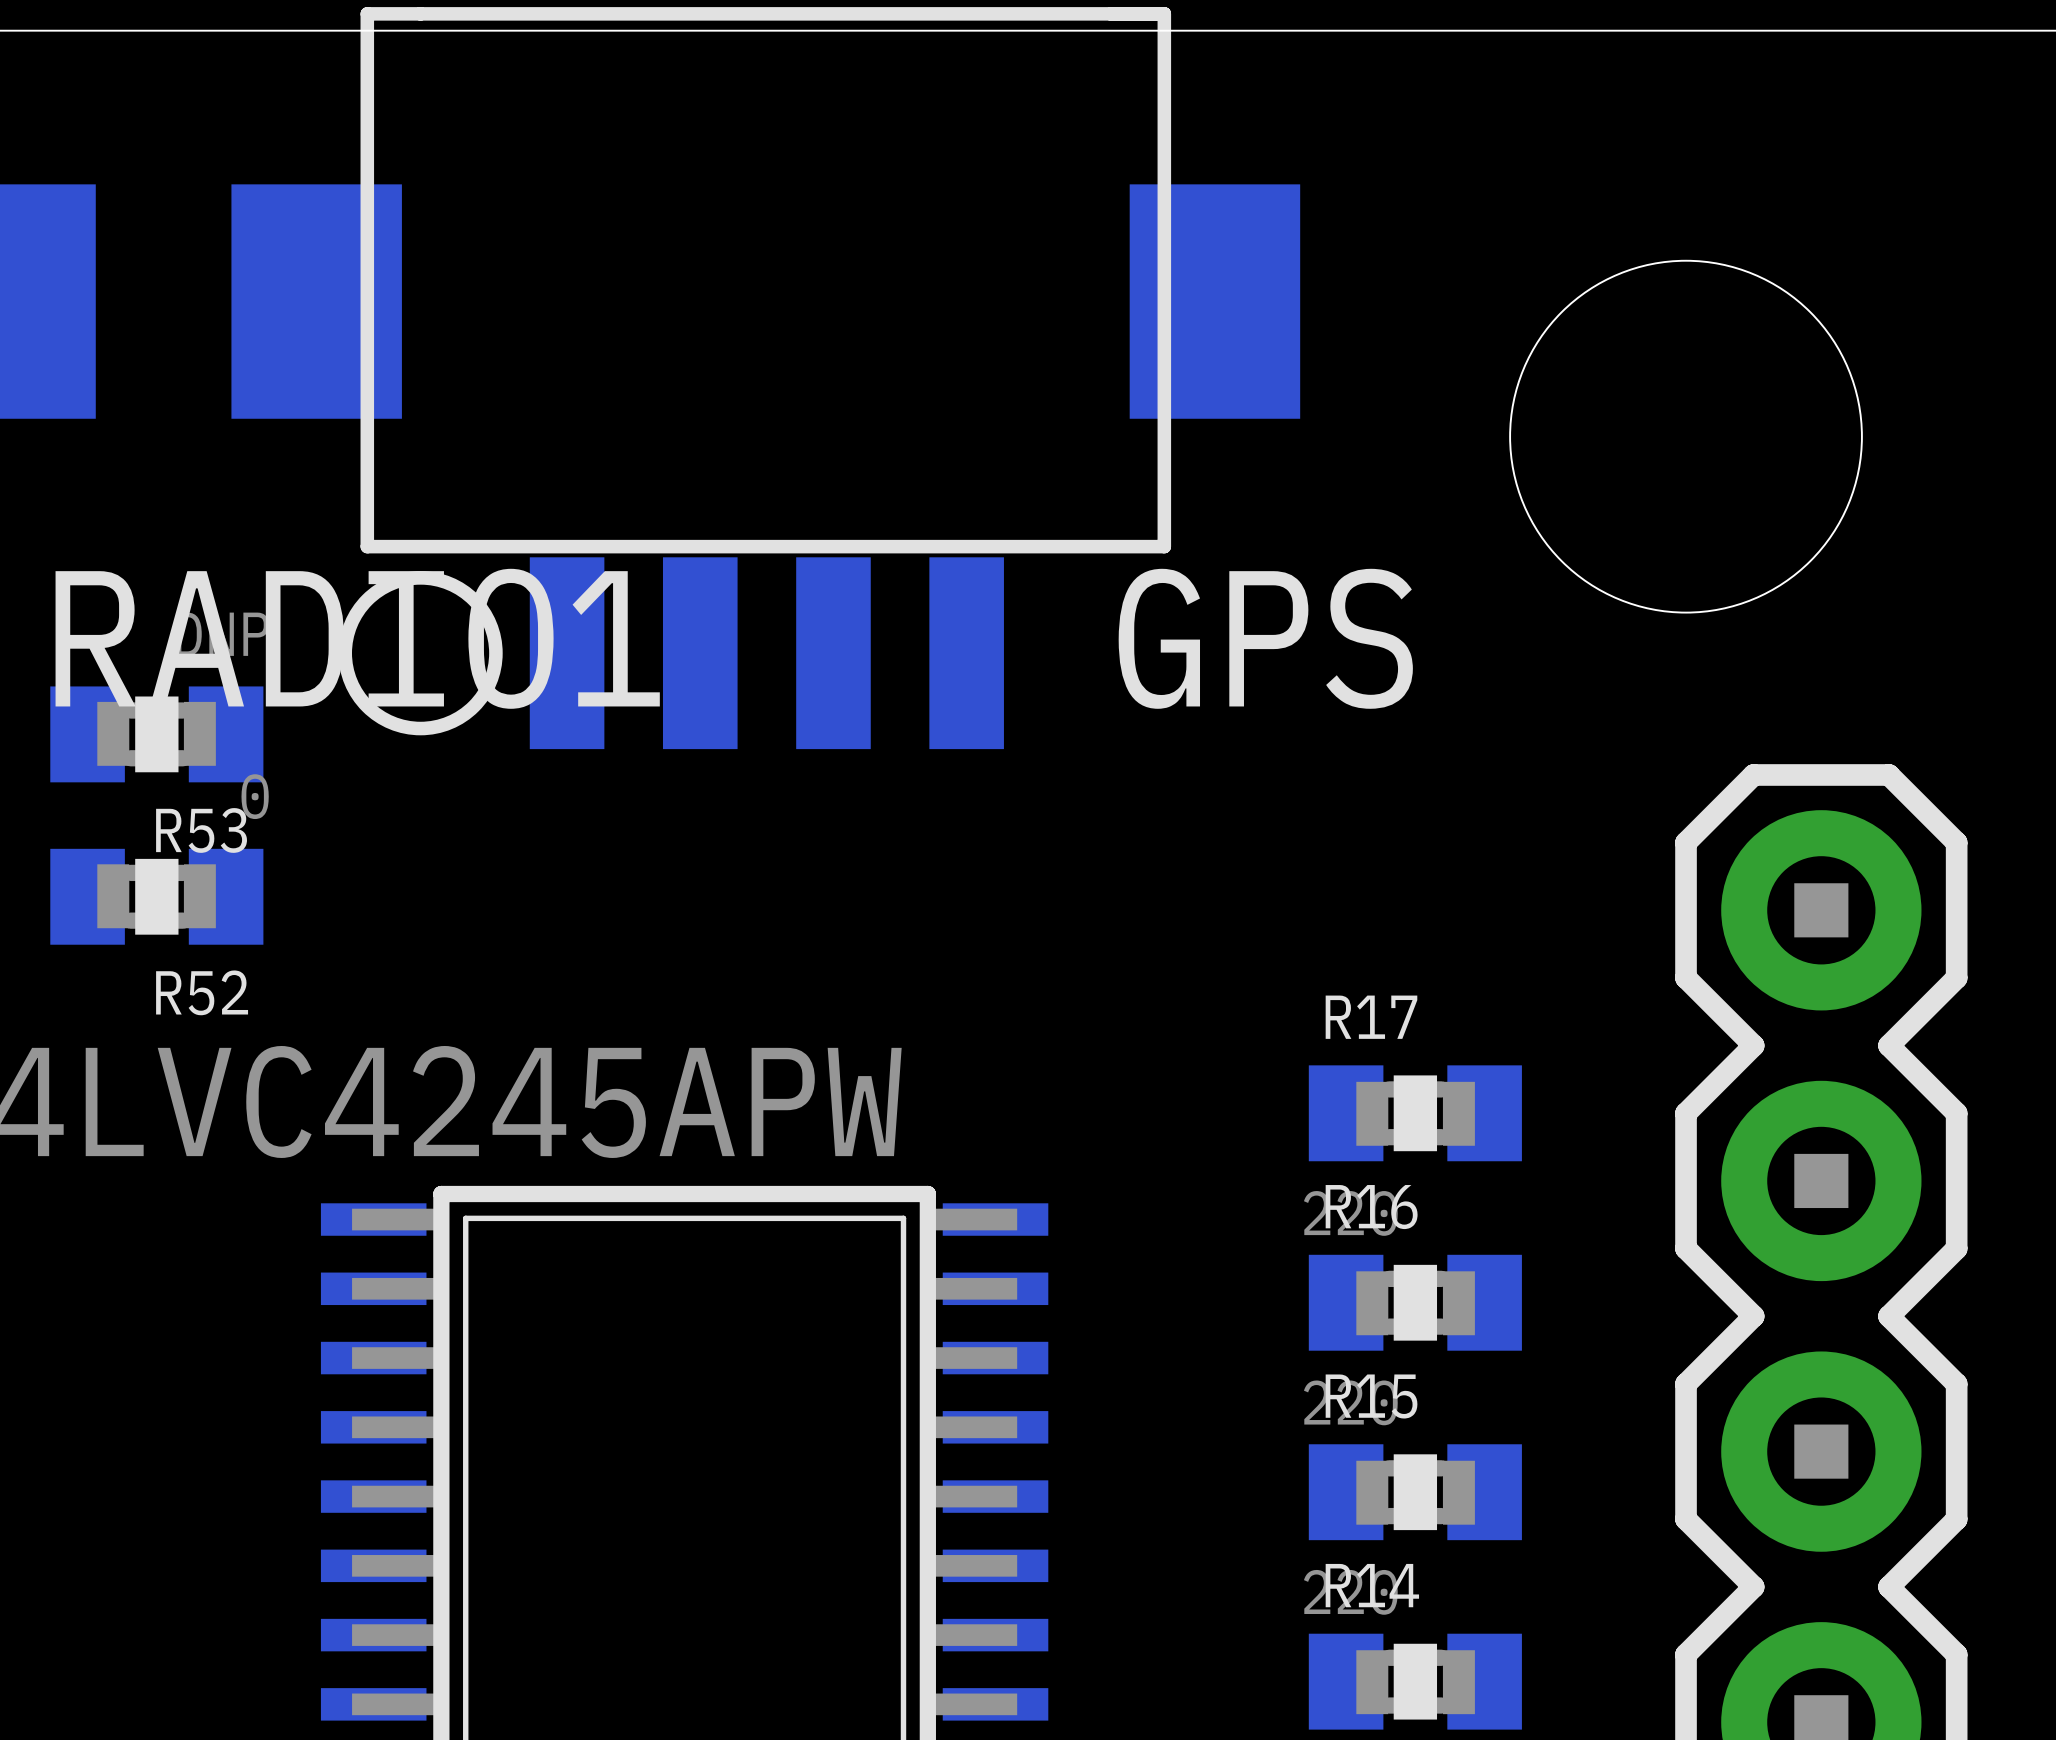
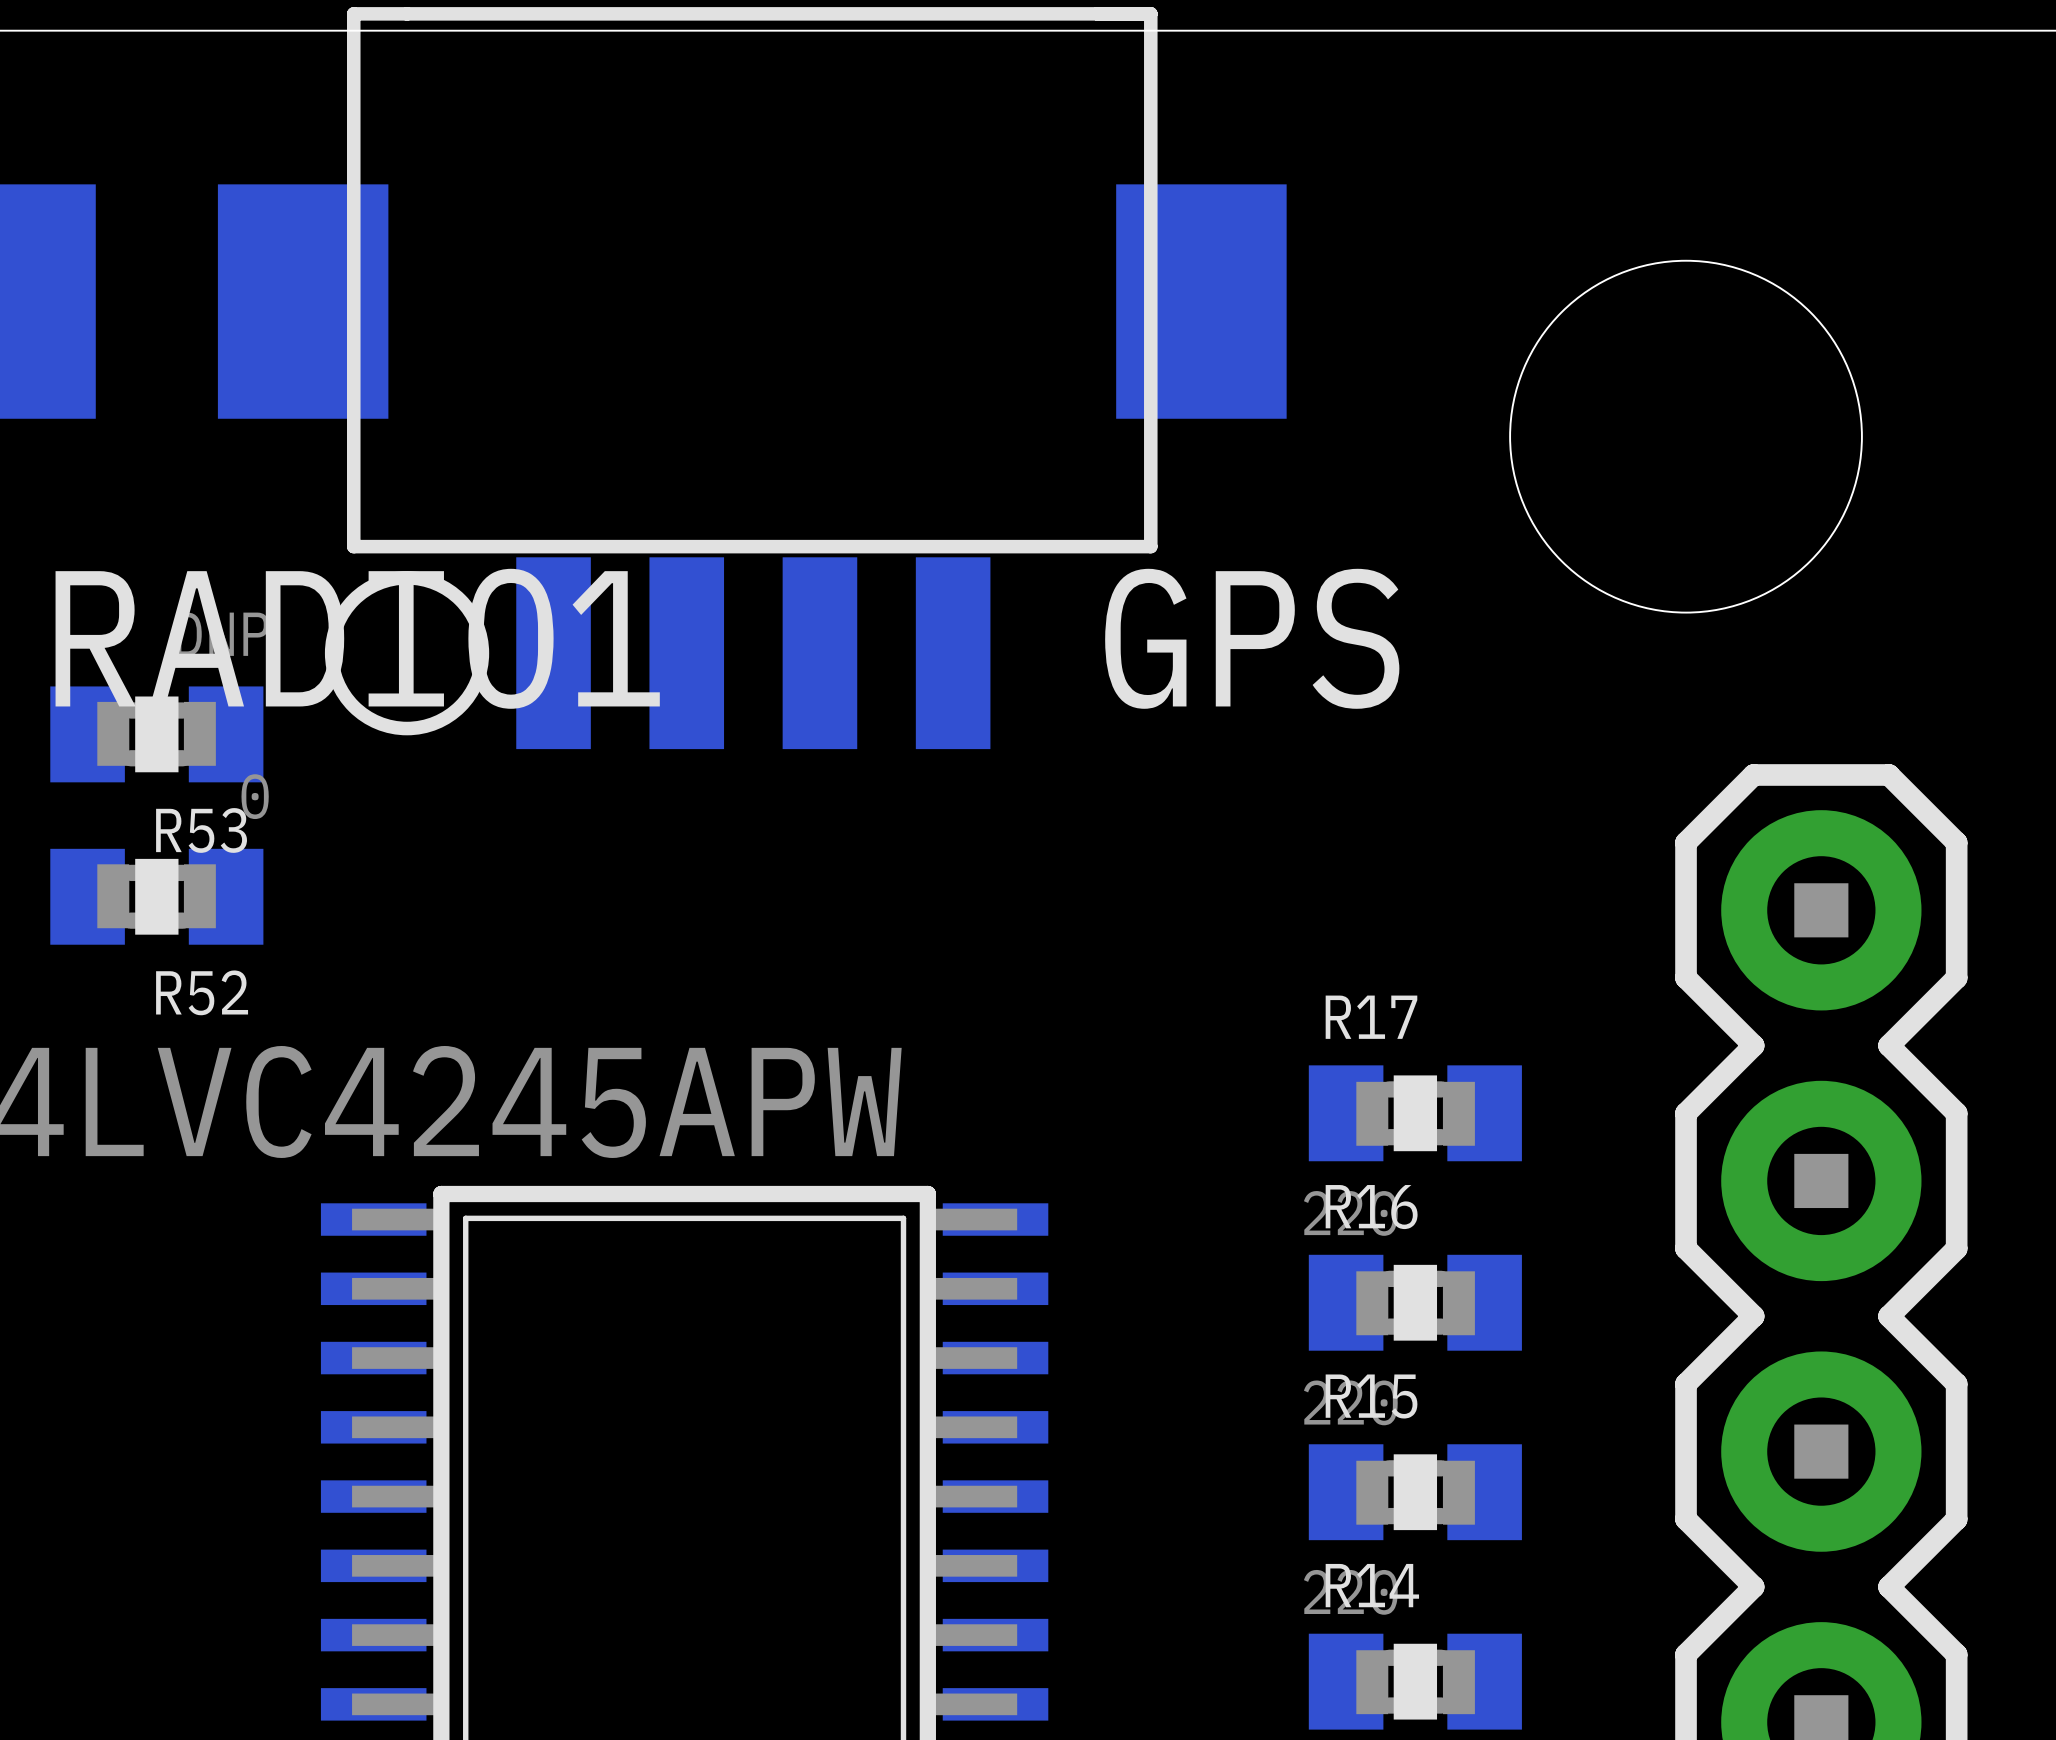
GPS position: (765, 378) -> (752, 378)

